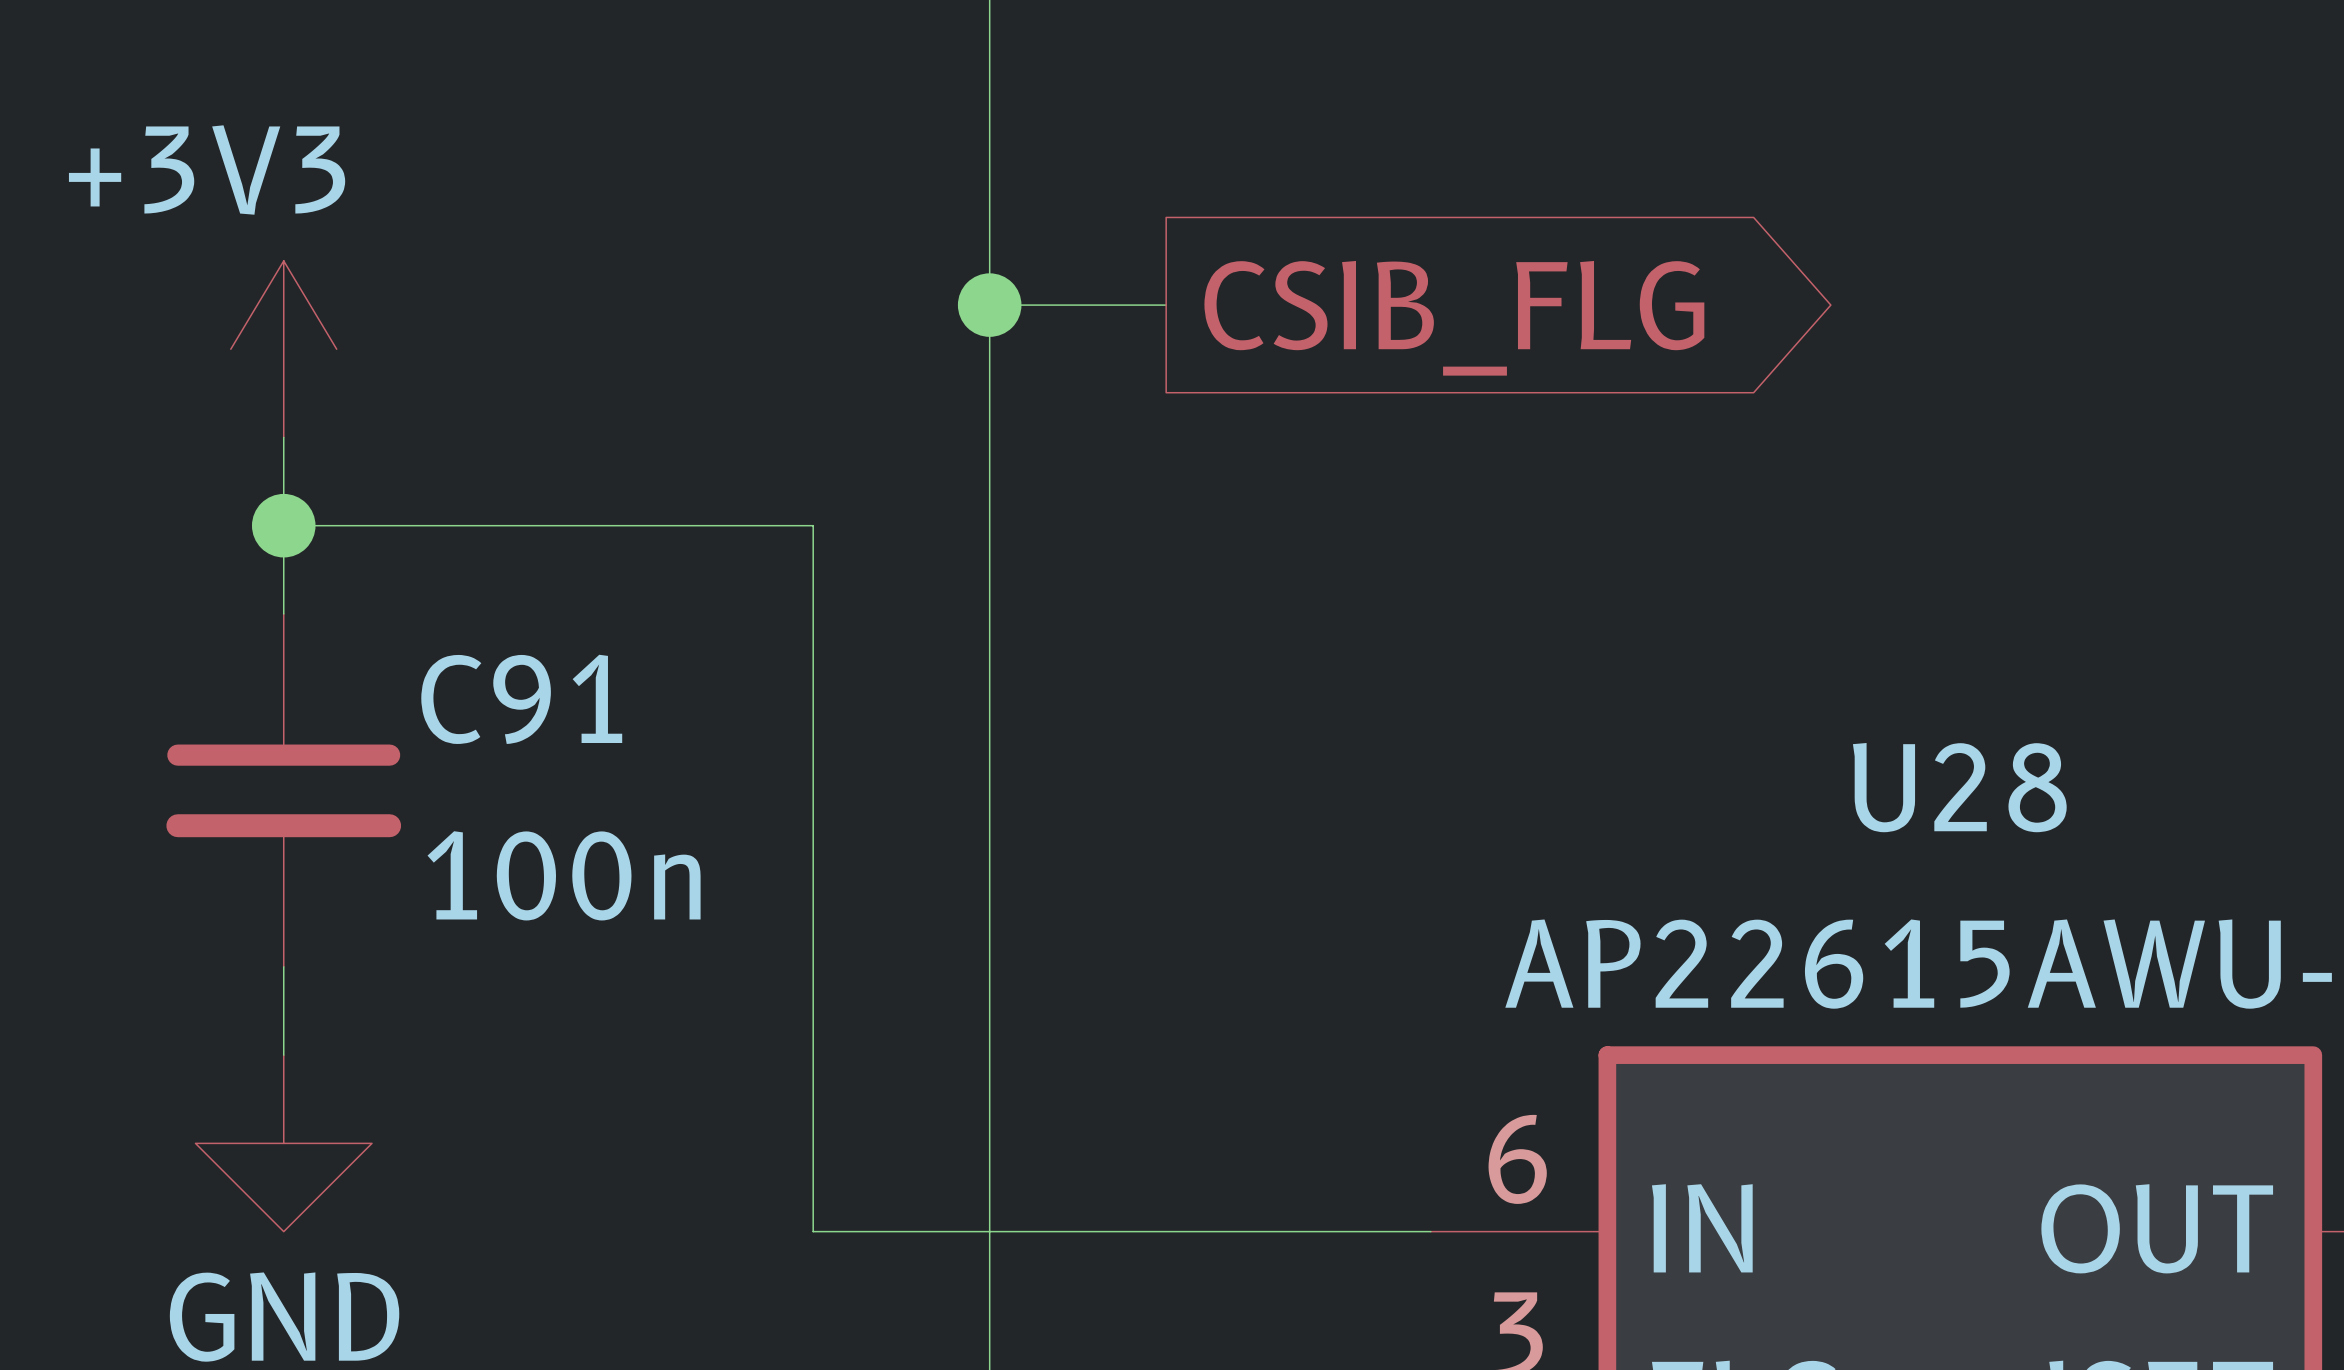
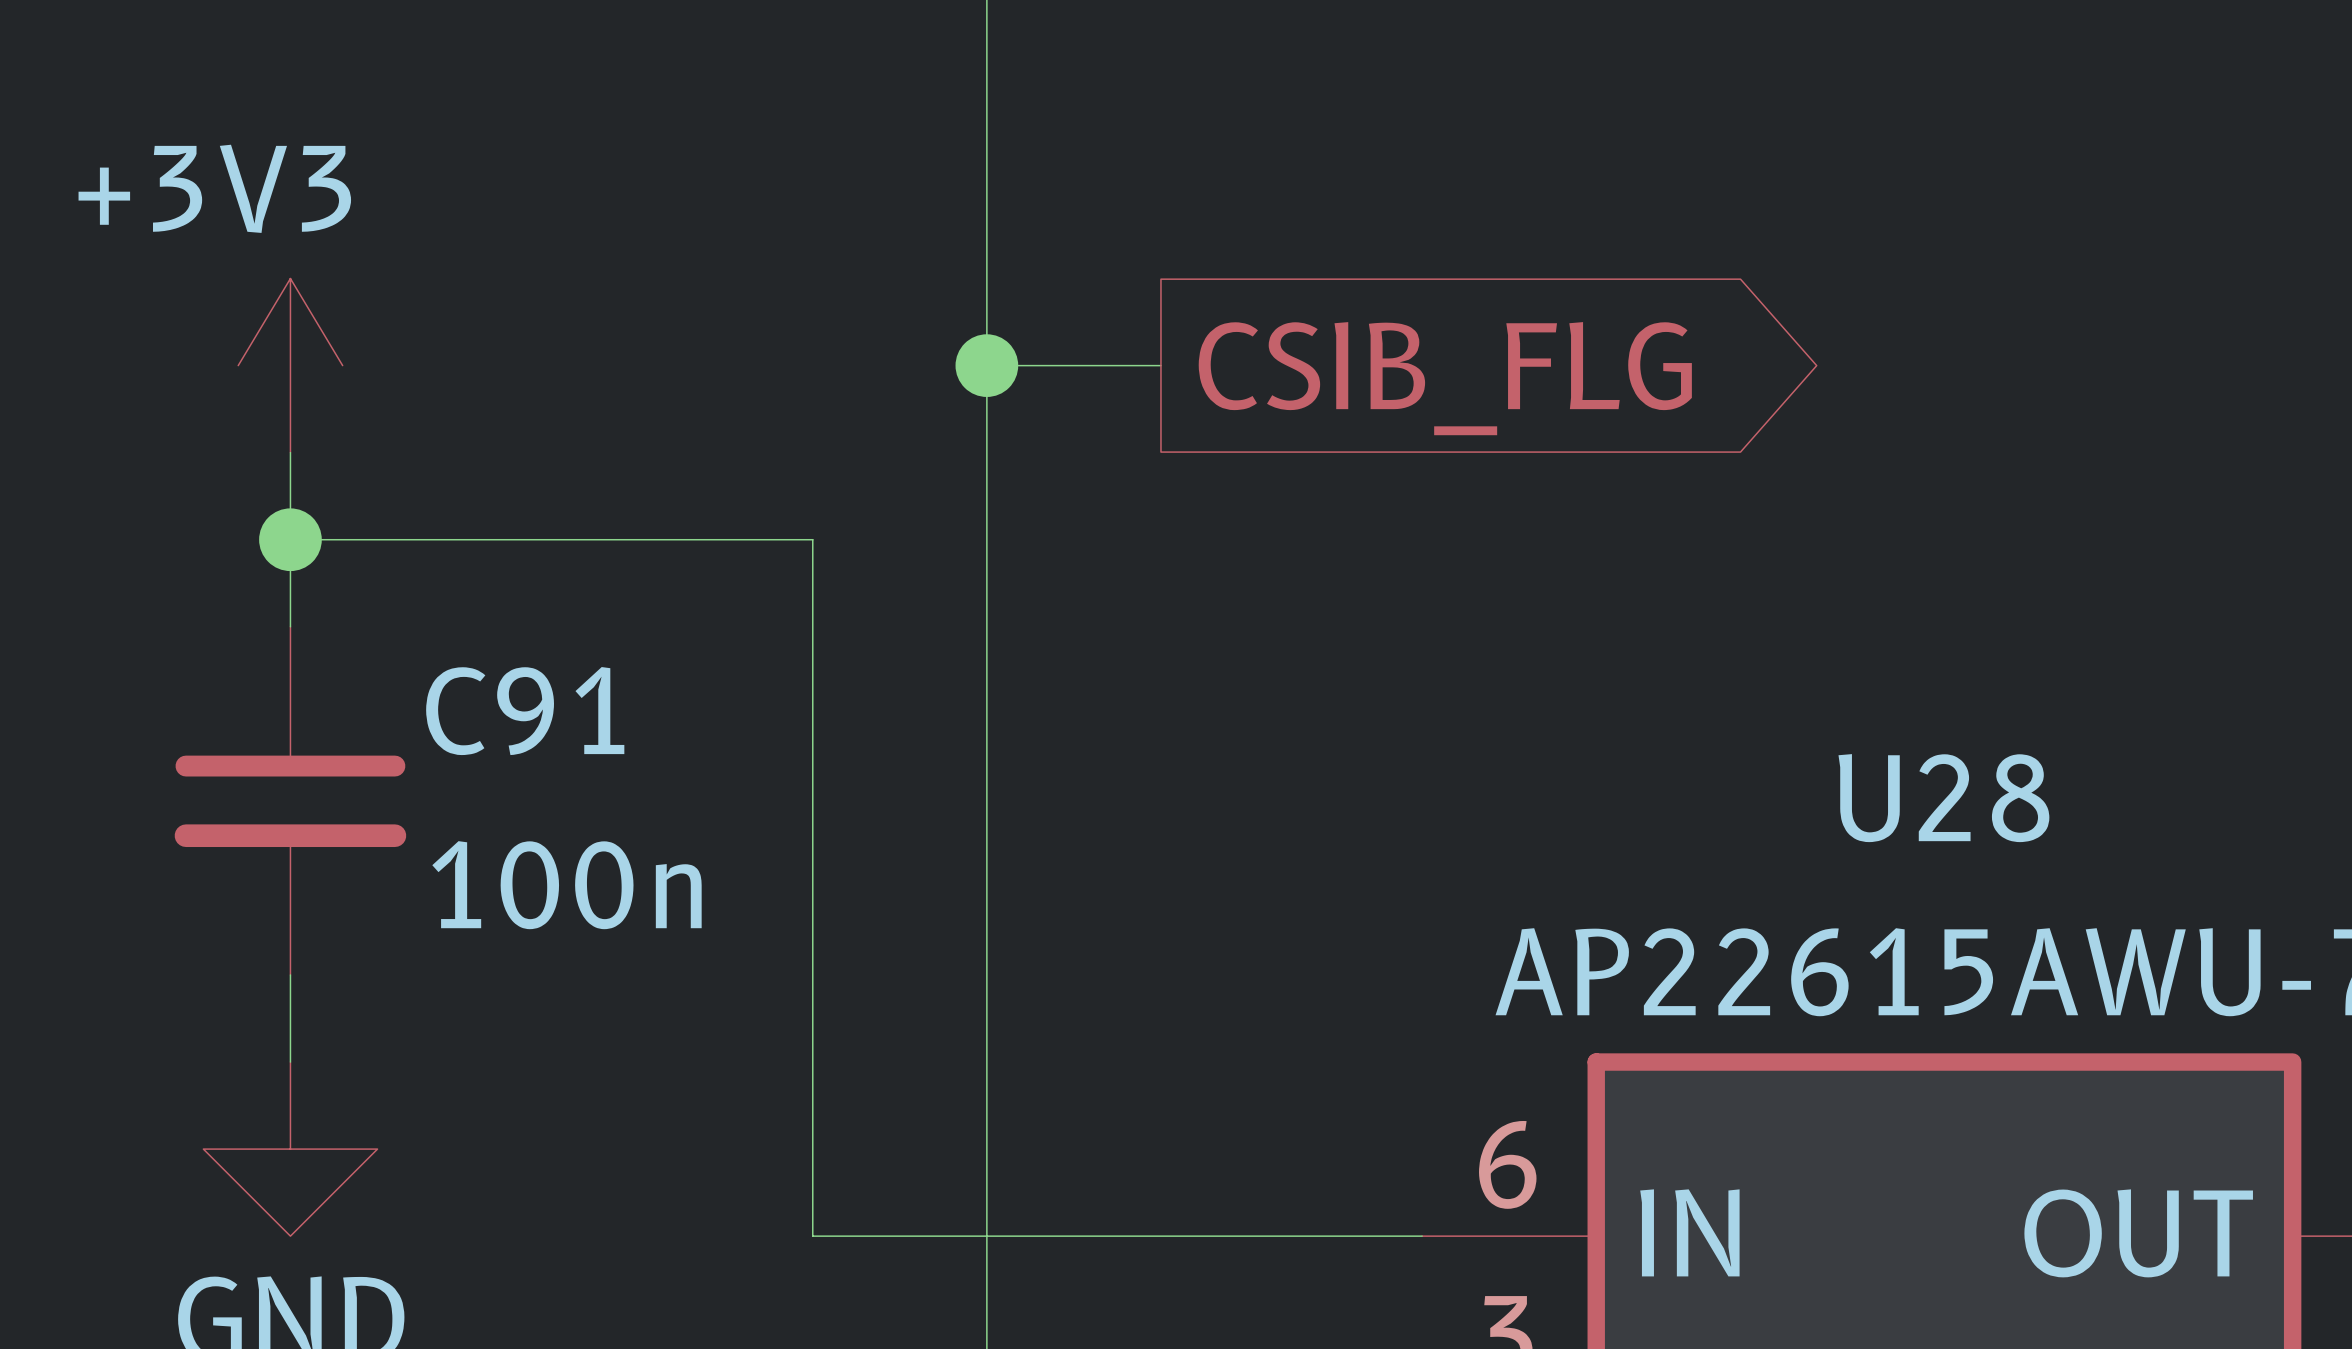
wire: (989, 305) (1166, 305) -> (986, 365) (1160, 365)
junction position: (989, 305) -> (986, 365)
global label position: CSIB_FLG (1454, 318) -> CSIB_FLG (1445, 378)

